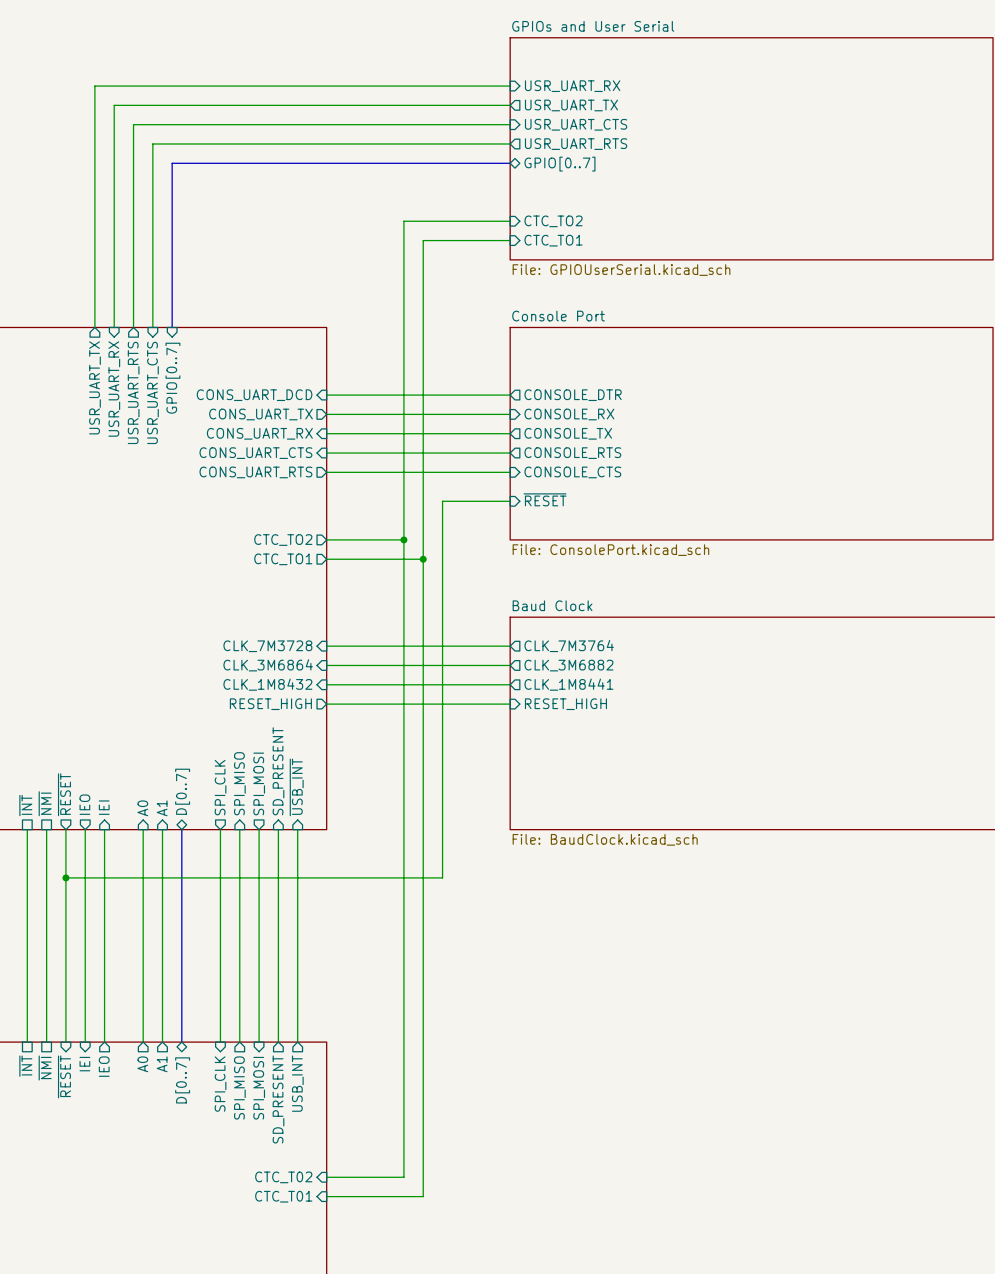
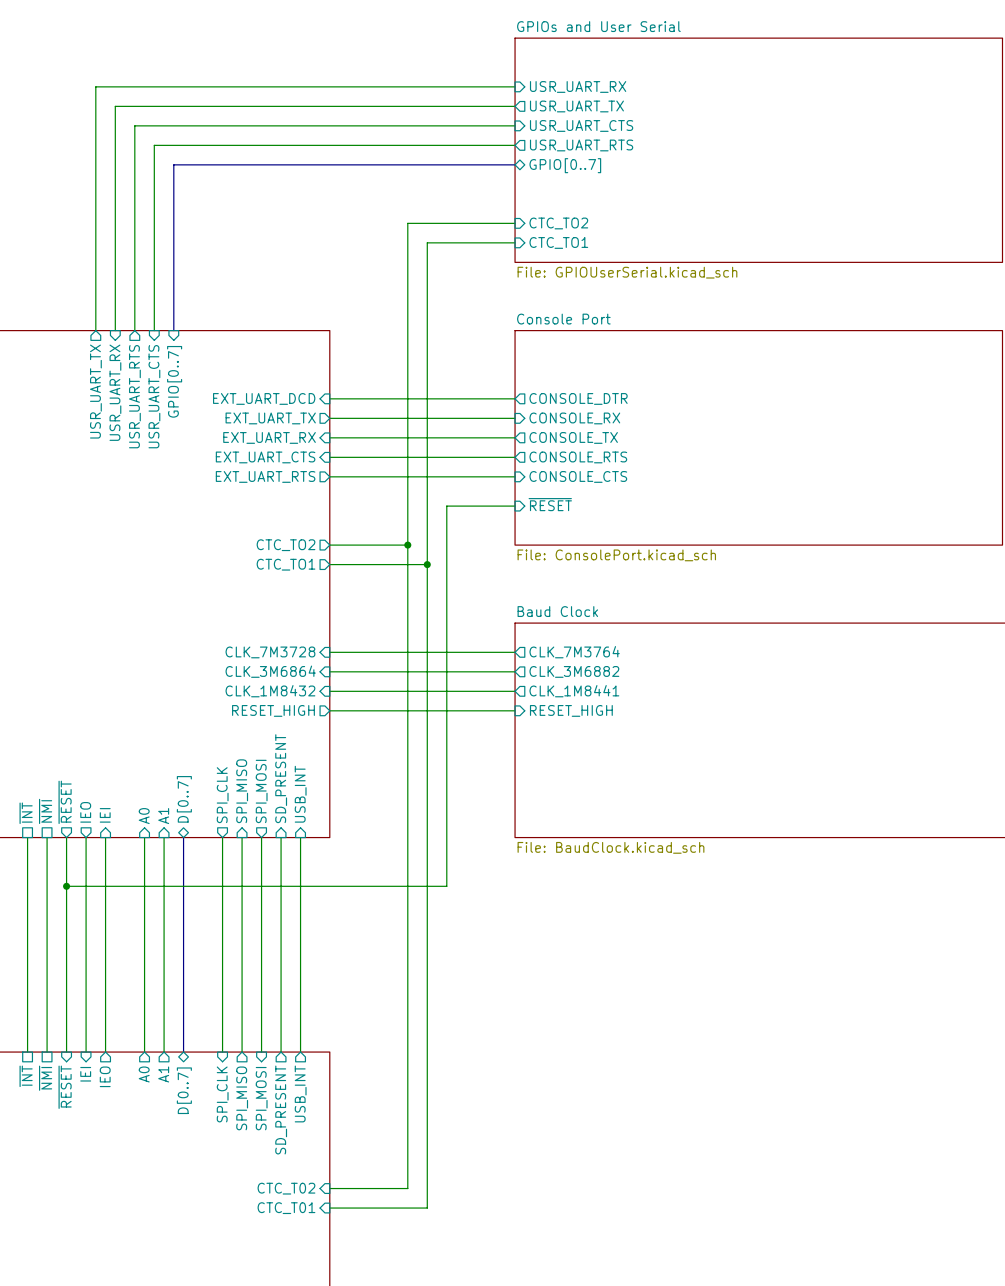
sheet pin: CONS_UART_DCD (254, 395) -> EXT_UART_DCD (264, 398)
sheet pin: CONS_UART_TX (261, 414) -> EXT_UART_TX (270, 418)
sheet pin: CONS_UART_RX (259, 433) -> EXT_UART_RX (269, 437)
sheet pin: CONS_UART_CTS (255, 453) -> EXT_UART_CTS (265, 457)
sheet pin: CONS_UART_RTS (255, 472) -> EXT_UART_RTS (265, 476)
sheet pin: ~{USB_INT} (296, 787) -> USB_INT (300, 794)

